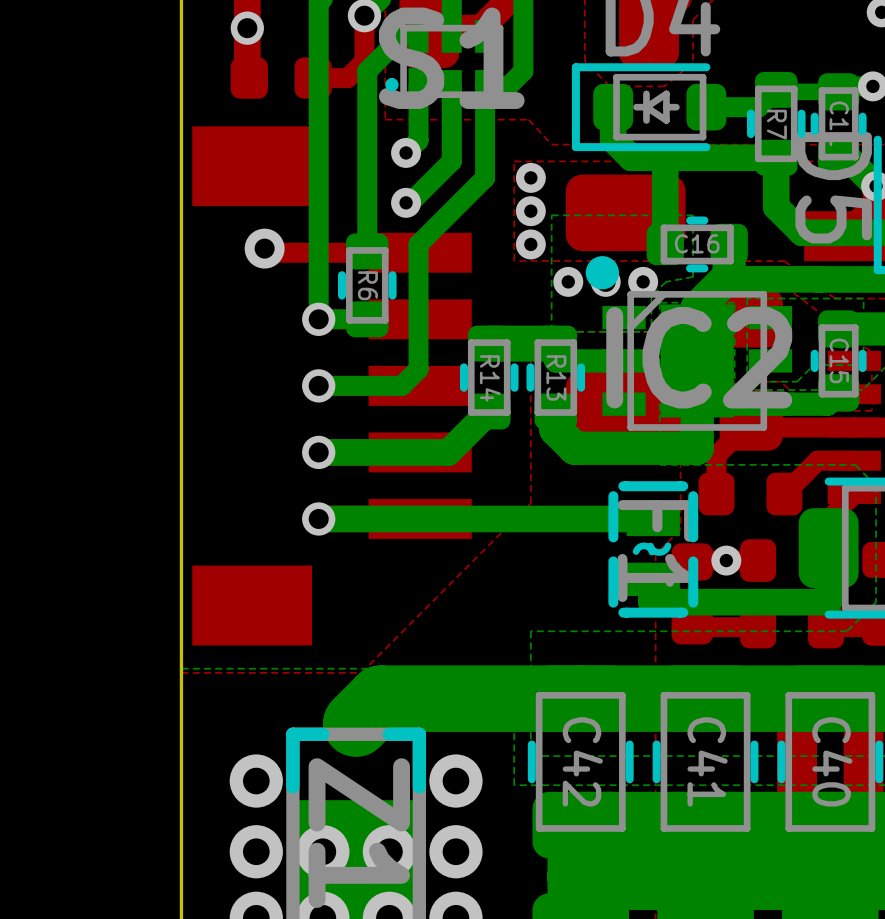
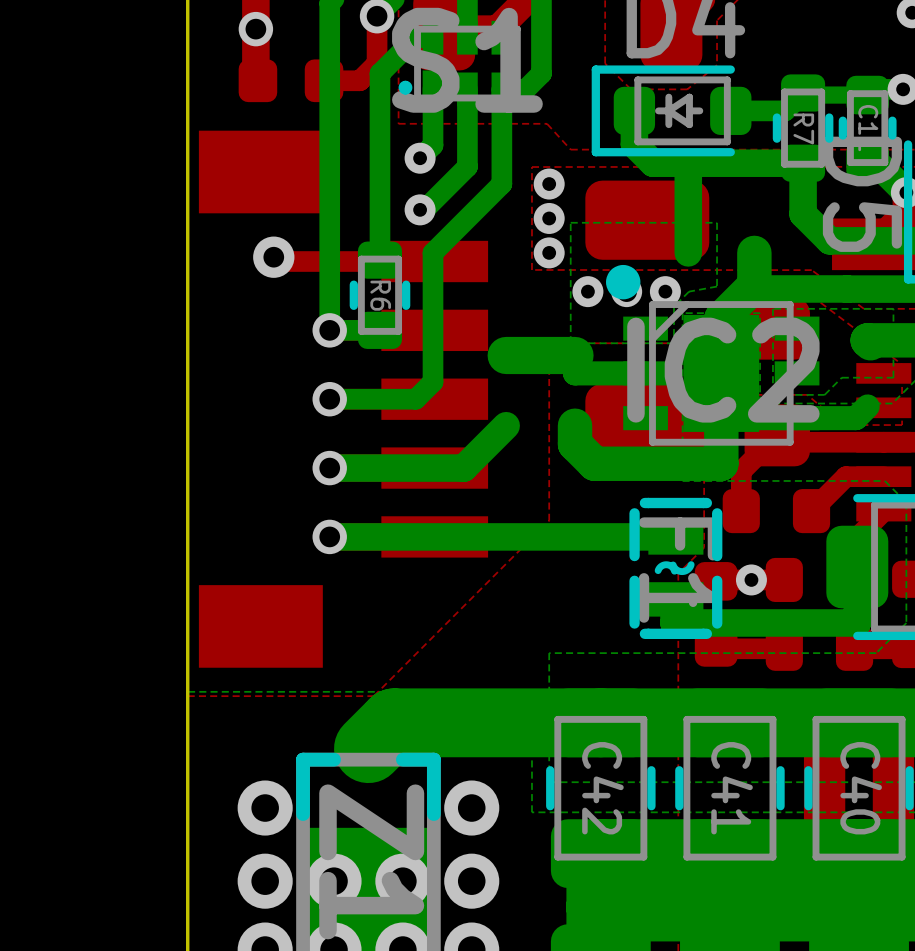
C16: (697, 244) -> none
C15: (838, 360) -> none
R14: (489, 377) -> none
R13: (555, 377) -> none

